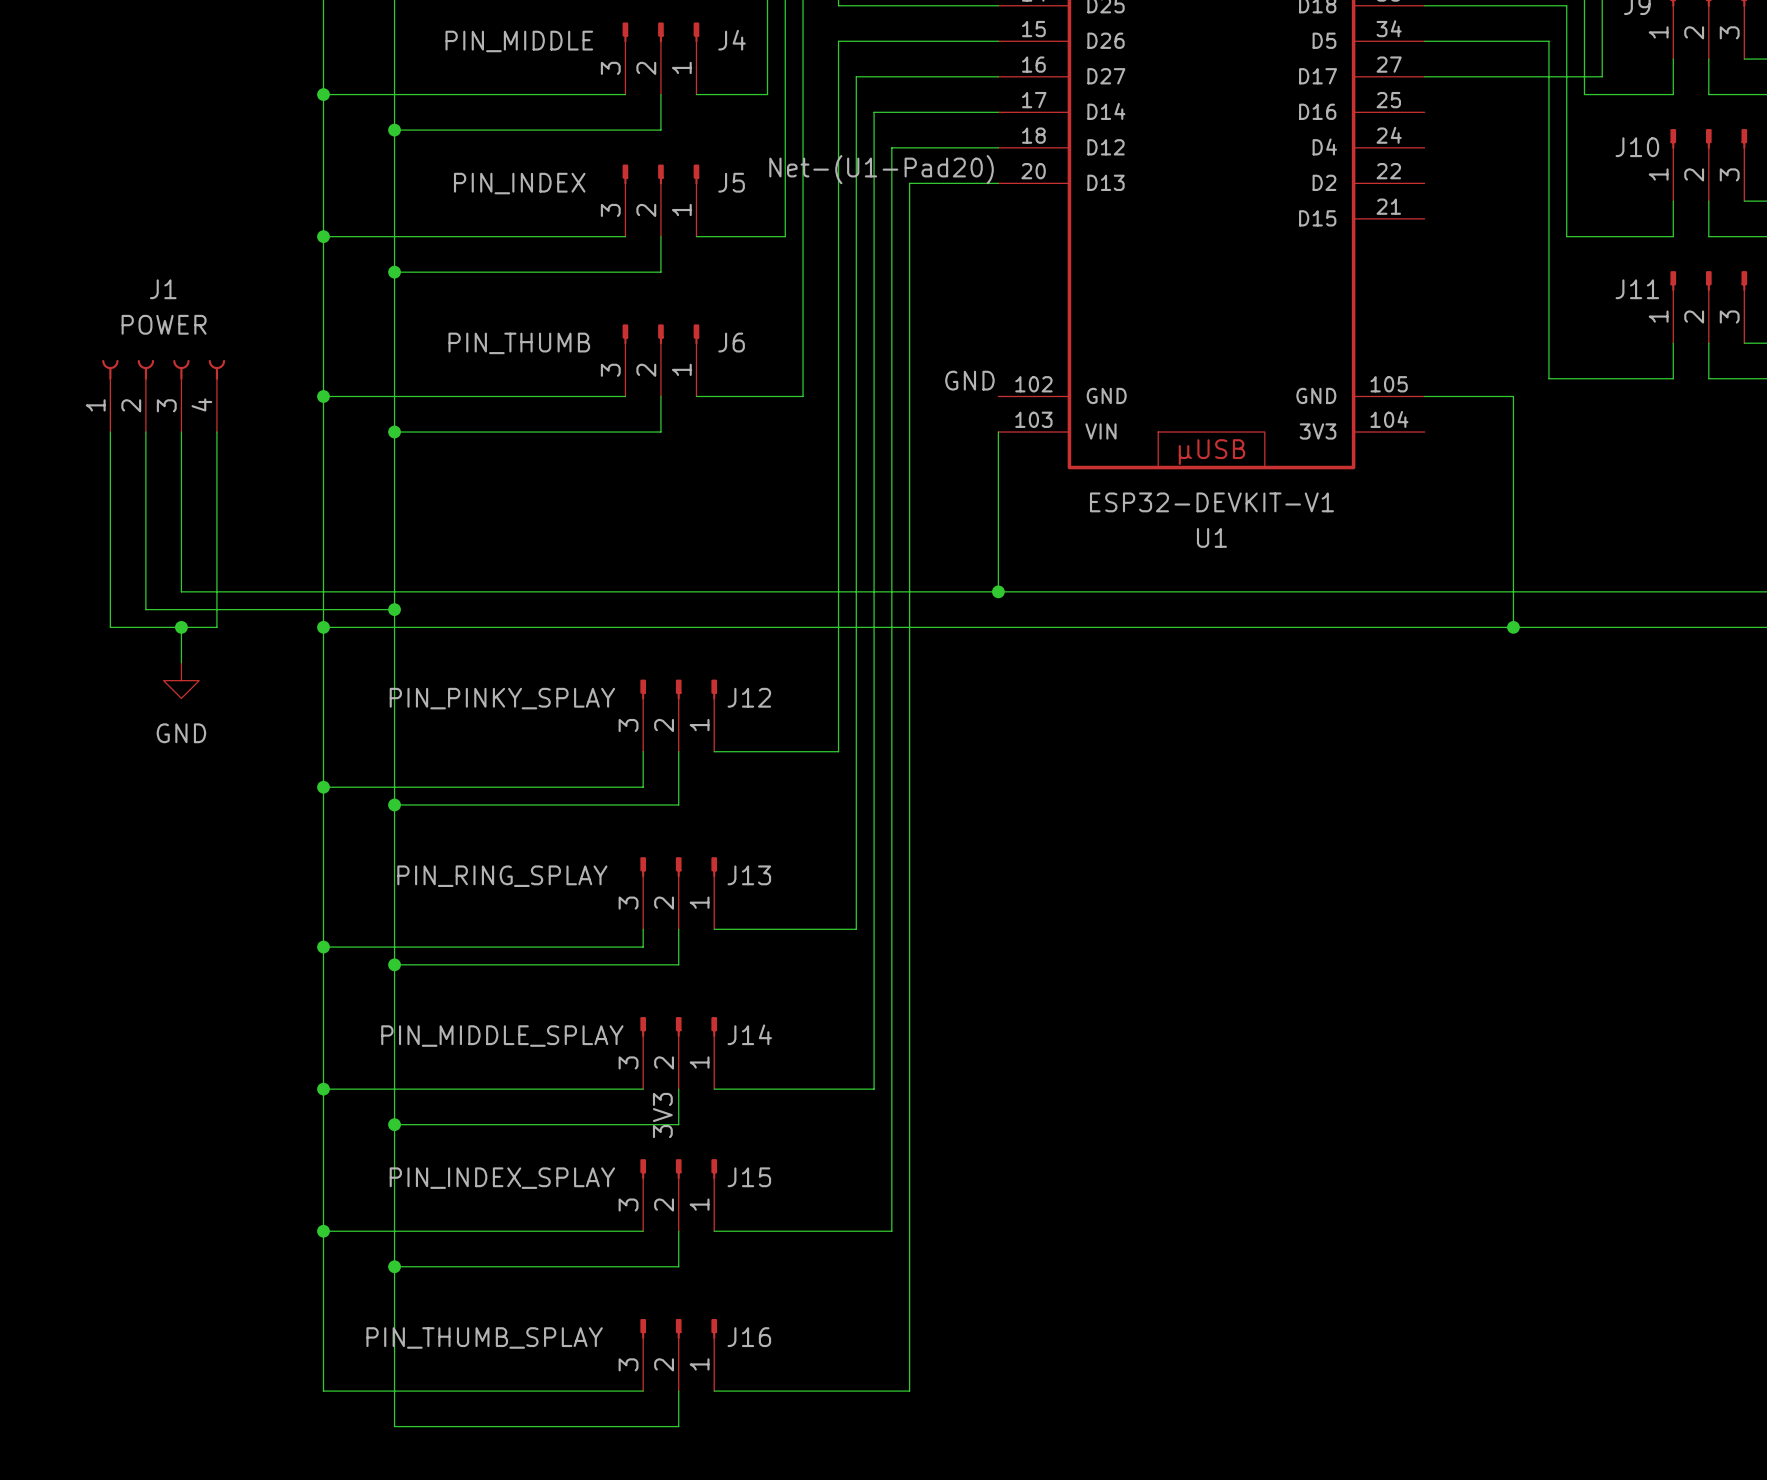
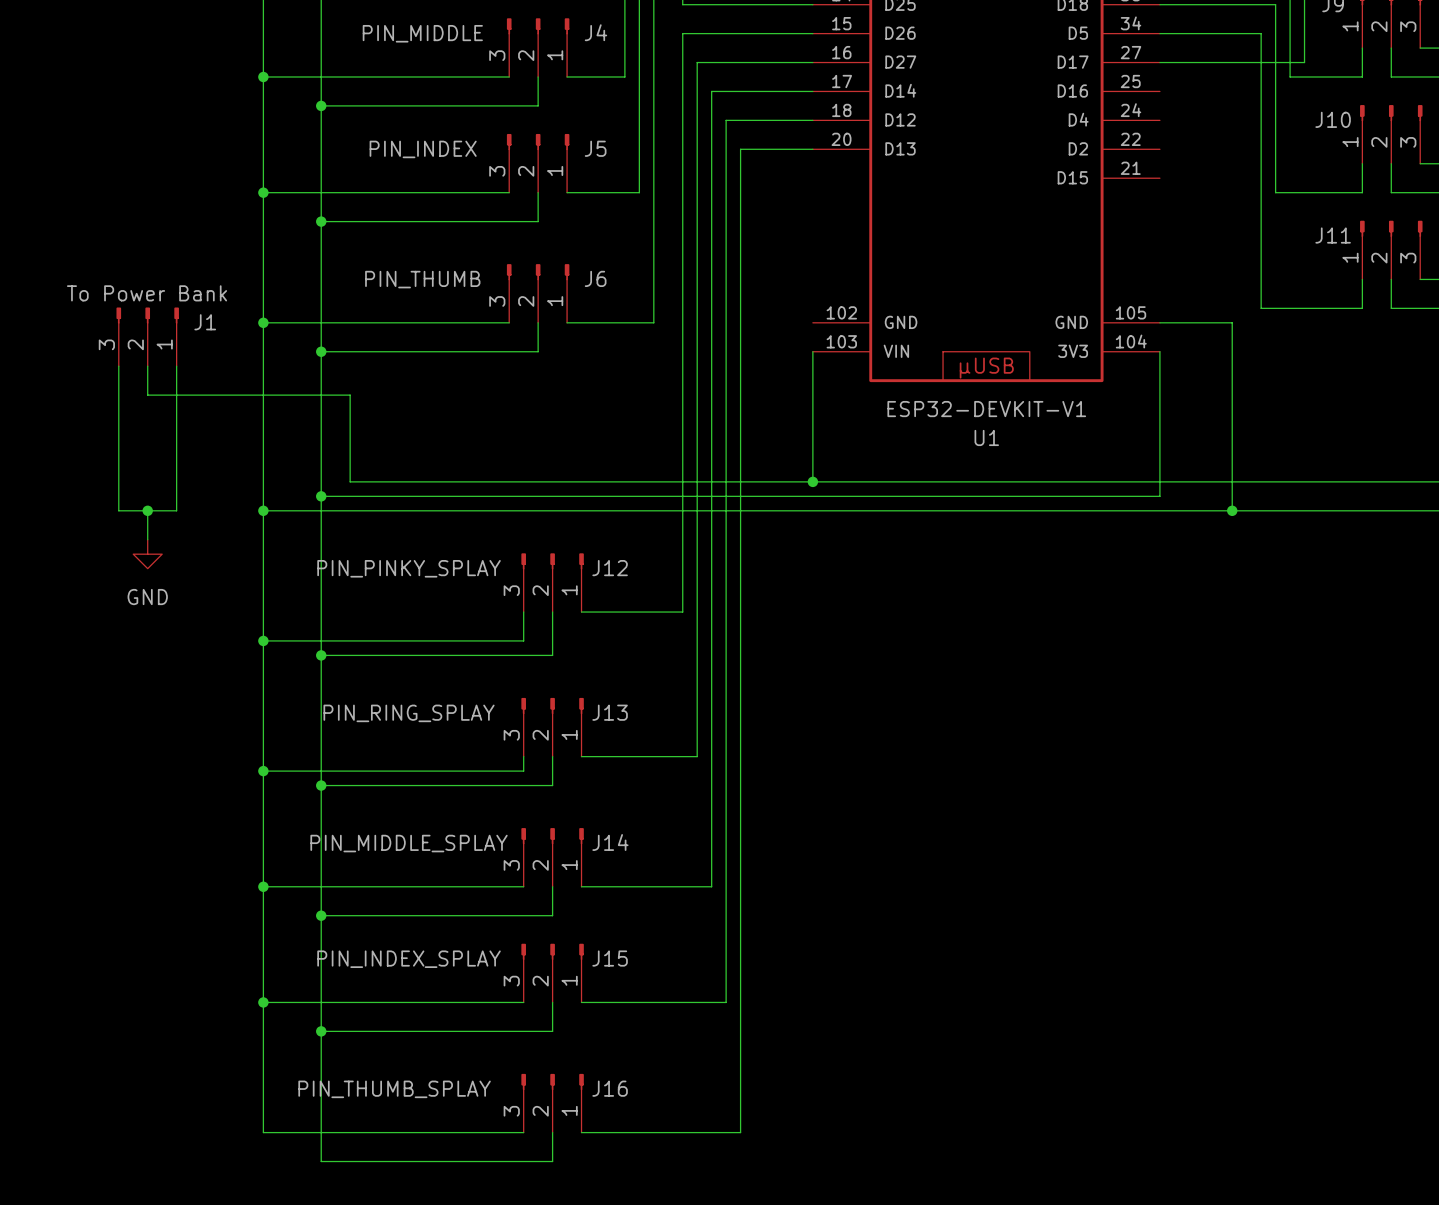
label: Net-(U1-Pad20) (881, 169) -> none
J1 name position: J1 (163, 289) -> J1 (205, 322)
J1 value: POWER (164, 324) -> To Power Bank (147, 293)
J1 symbol: [102, 359, 226, 433] -> [116, 307, 179, 367]
label: GND (969, 380) -> none
wire: (110, 432) (110, 627) (145, 627) -> (118, 496) (118, 510)
wire: (181, 485) (181, 591) (430, 591) -> (147, 395) (350, 395) (350, 481)
wire: (145, 609) (394, 609) -> (1159, 351) (1159, 496) (321, 496)
label: 3V3 (662, 1115) -> none

